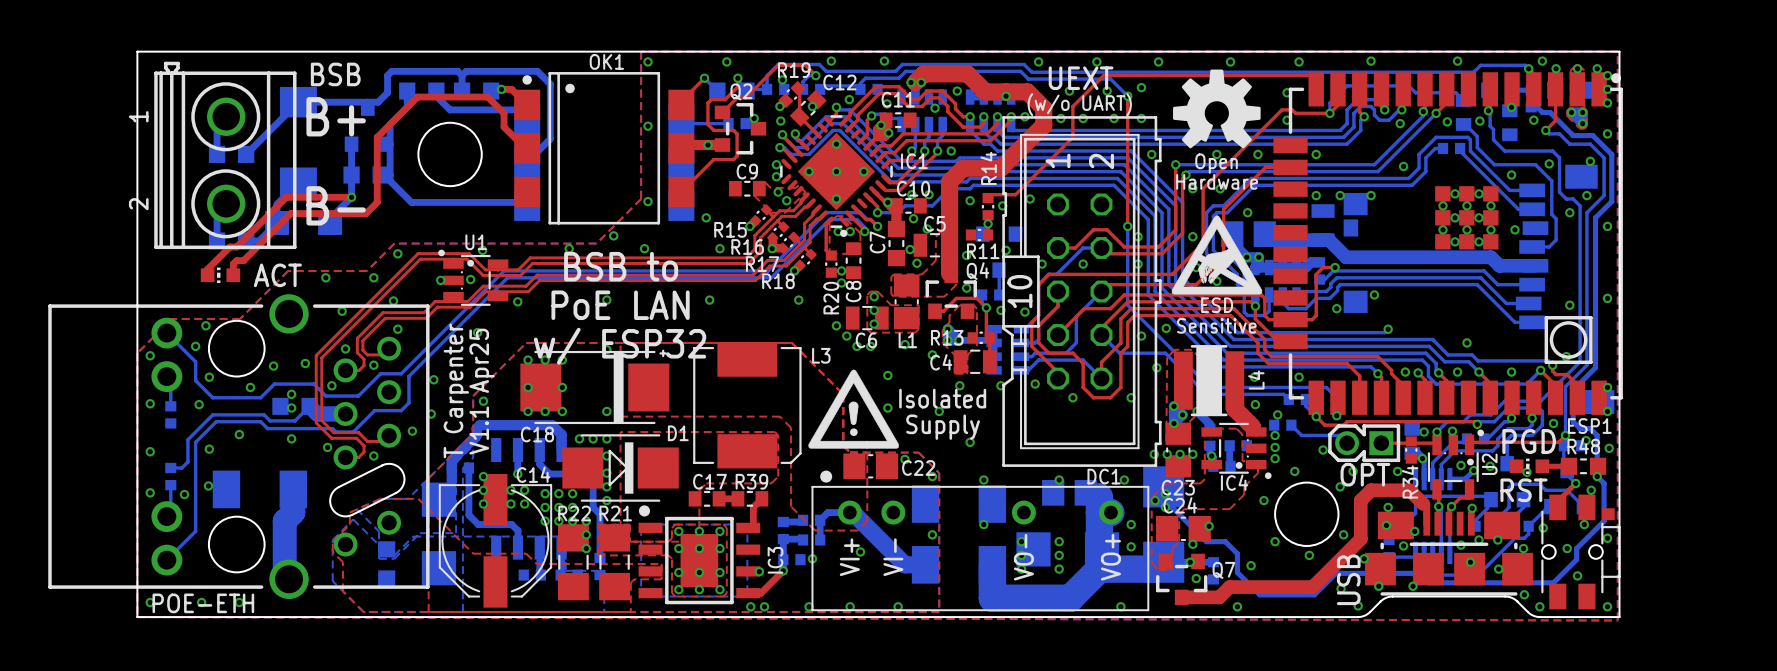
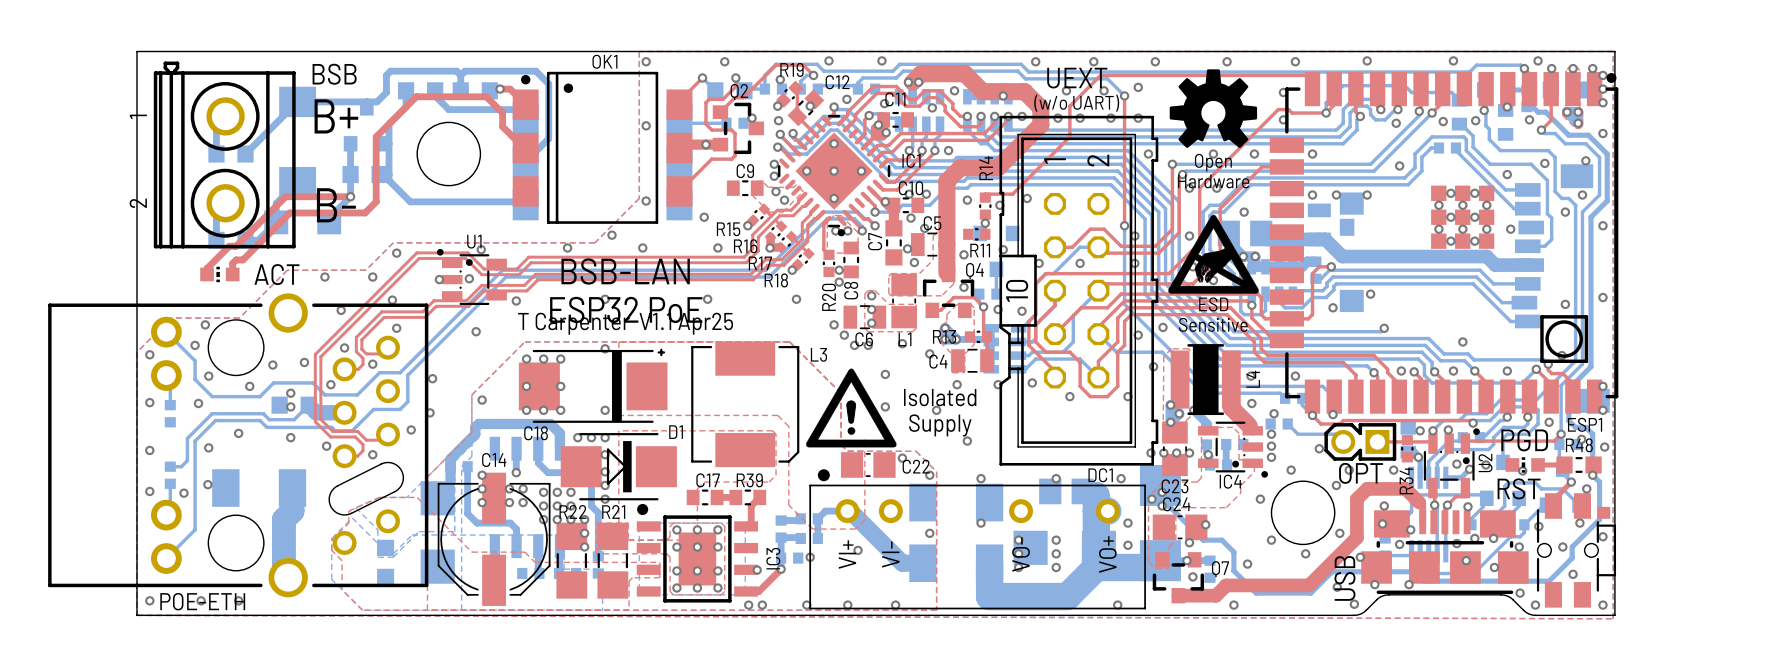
text: BSB to (621, 266) -> BSB-LAN (625, 271)
text: PoE LAN (620, 305) -> ESP32 PoE (626, 309)
text: none -> T Carpenter V1.1 Apr25 (625, 323)
text: w/ ESP32 (620, 346) -> none
text: T Carpenter (456, 390) -> none
text: V1.1 Apr25 (482, 391) -> none
C14 name position: C14 (533, 474) -> C14 (494, 460)

